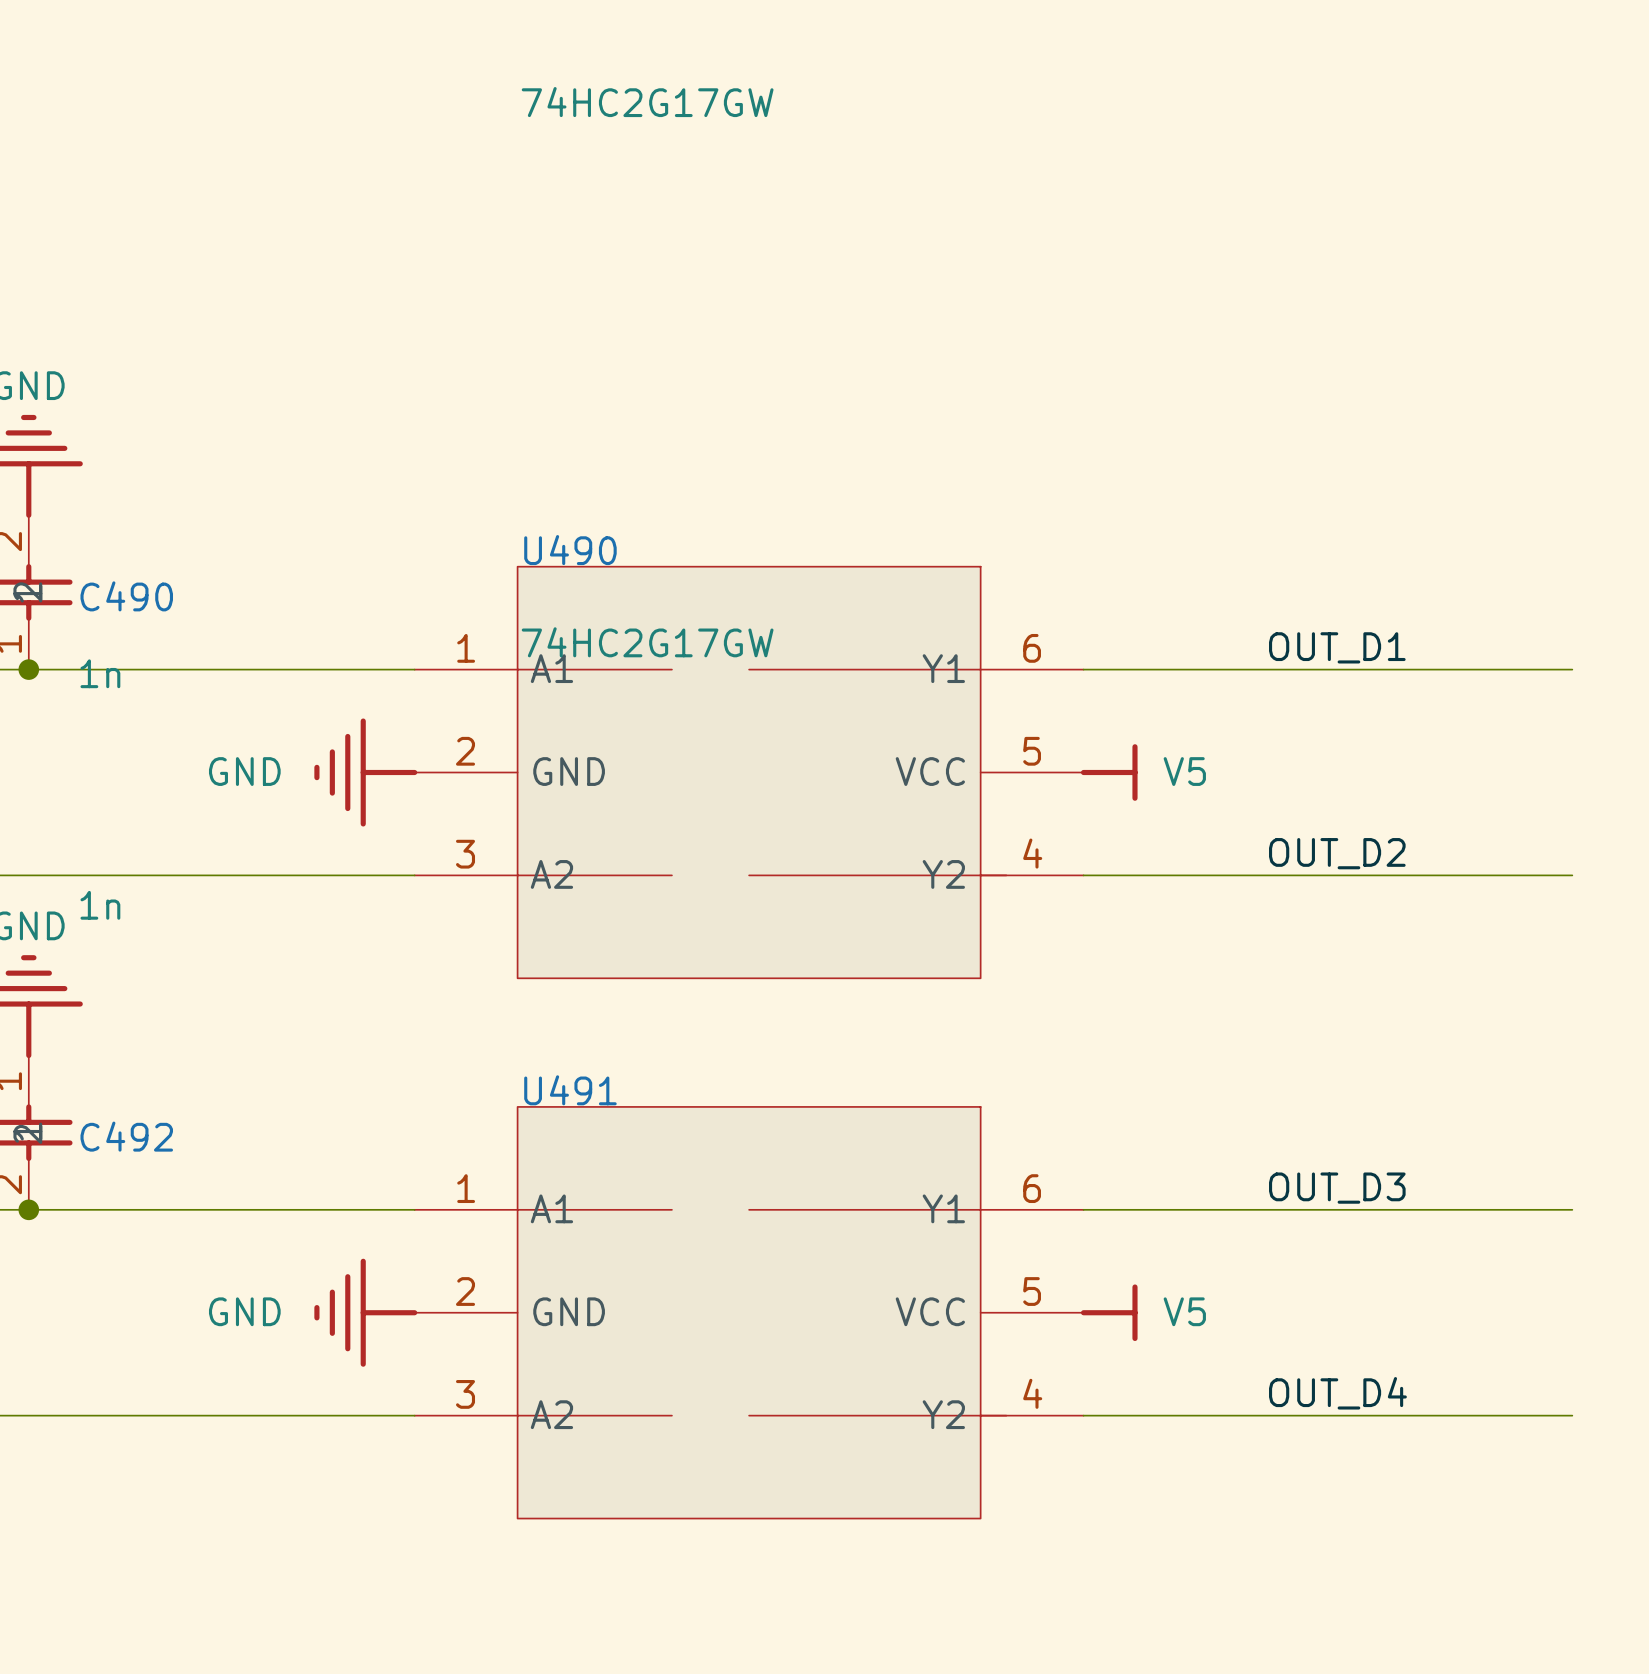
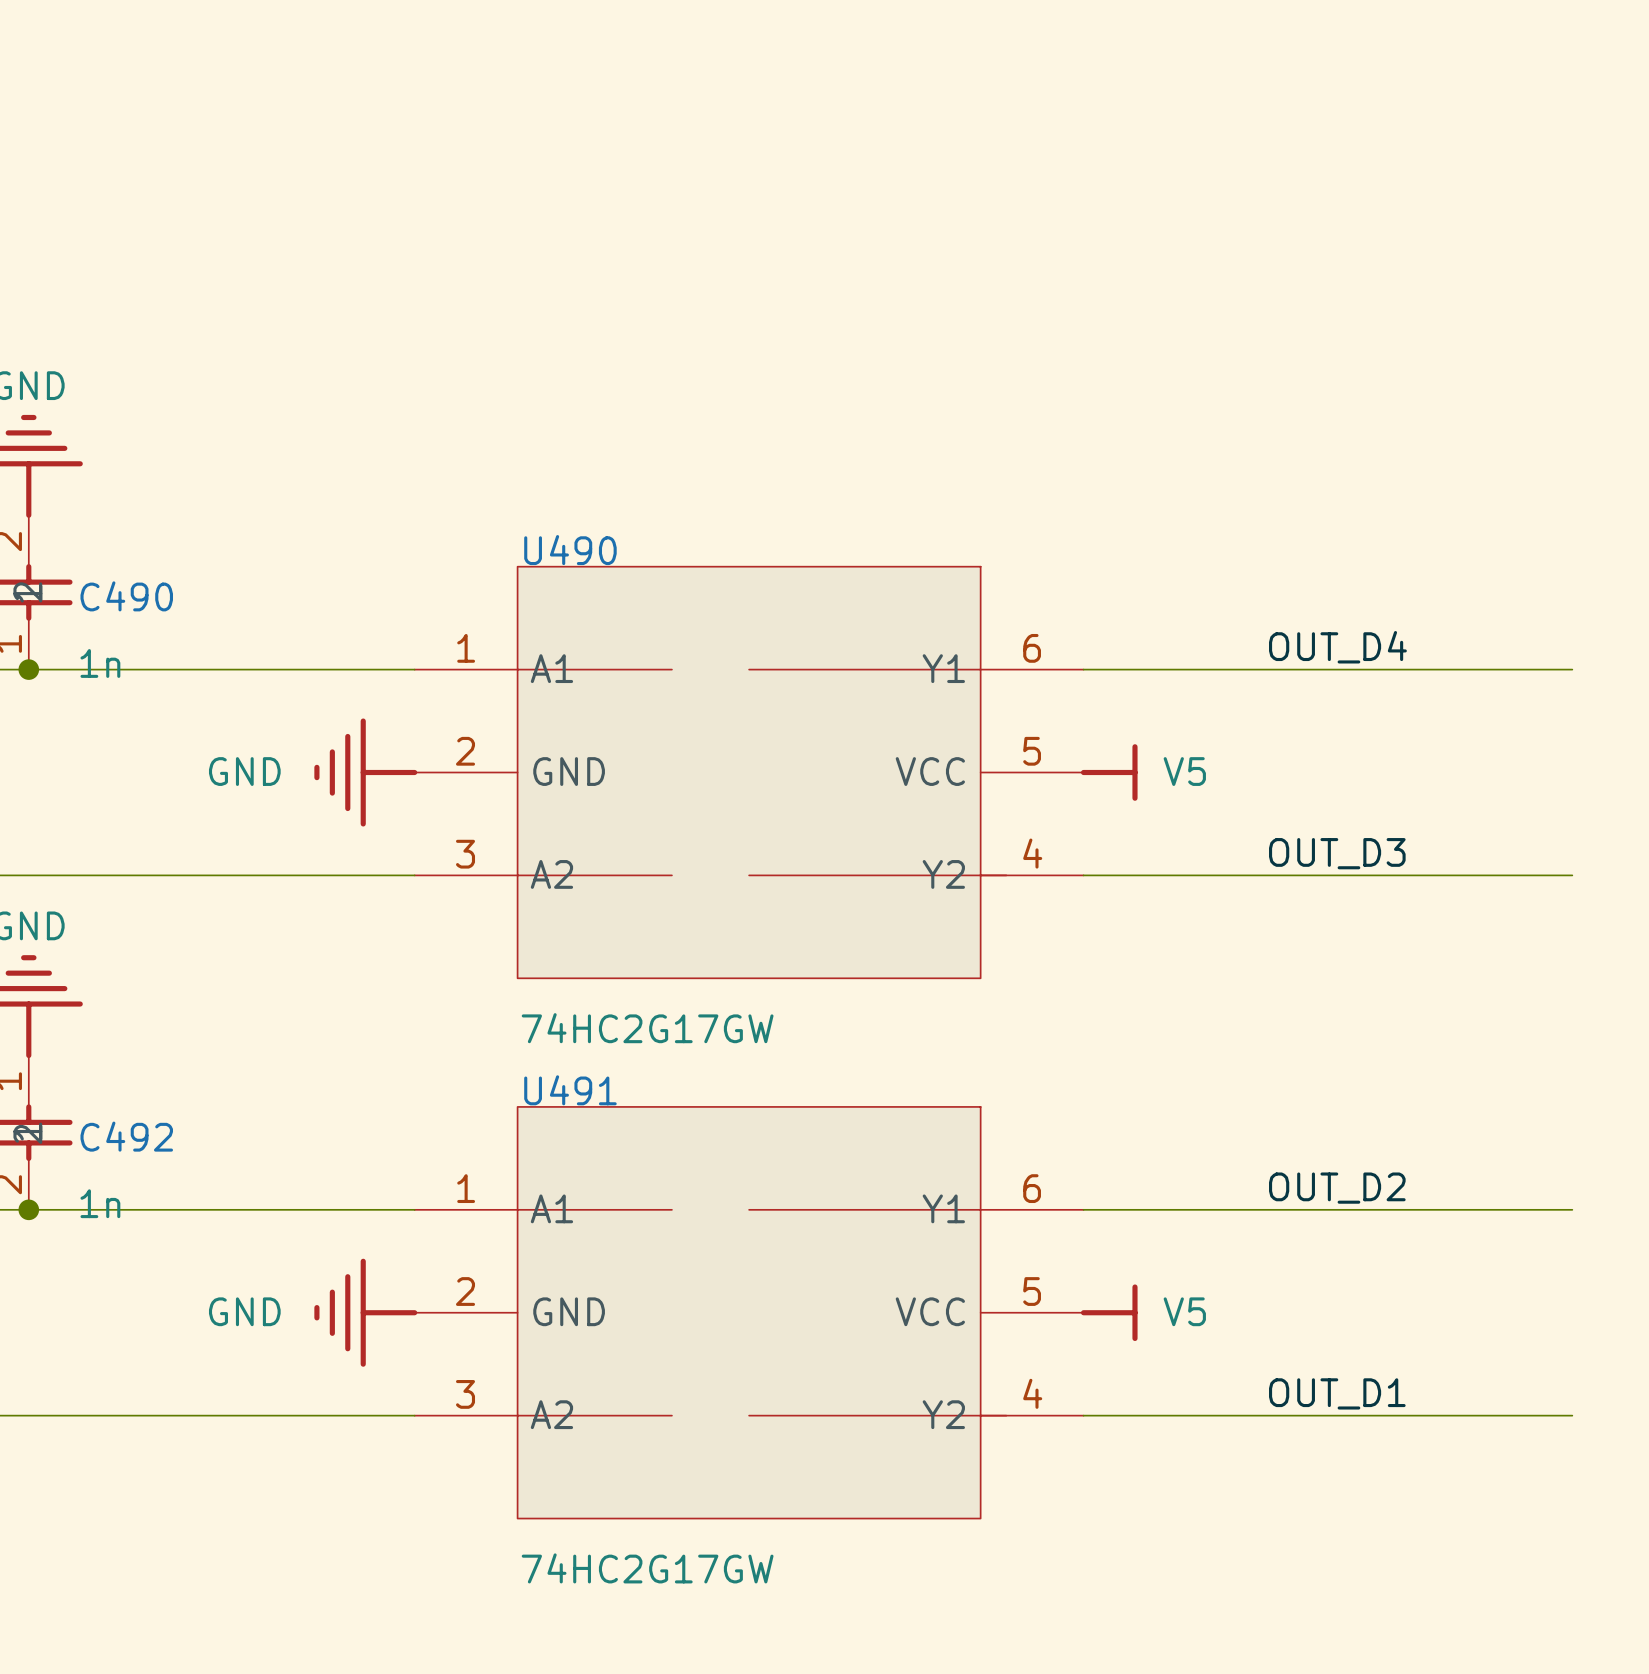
U490 text: 74HC2G17GW (647, 102) -> none
U491 text: 74HC2G17GW (647, 642) -> none
label: OUT_D1 (1337, 647) -> OUT_D4 (1337, 647)
C490 value: none -> 1n (100, 663)
C490 text: 1n (100, 673) -> none
label: OUT_D2 (1337, 853) -> OUT_D3 (1337, 853)
C492 text: 1n (100, 905) -> none
U490 value: none -> 74HC2G17GW (647, 1028)
label: OUT_D3 (1337, 1188) -> OUT_D2 (1337, 1188)
C492 value: none -> 1n (100, 1203)
label: OUT_D4 (1337, 1393) -> OUT_D1 (1337, 1393)
U491 value: none -> 74HC2G17GW (647, 1568)

